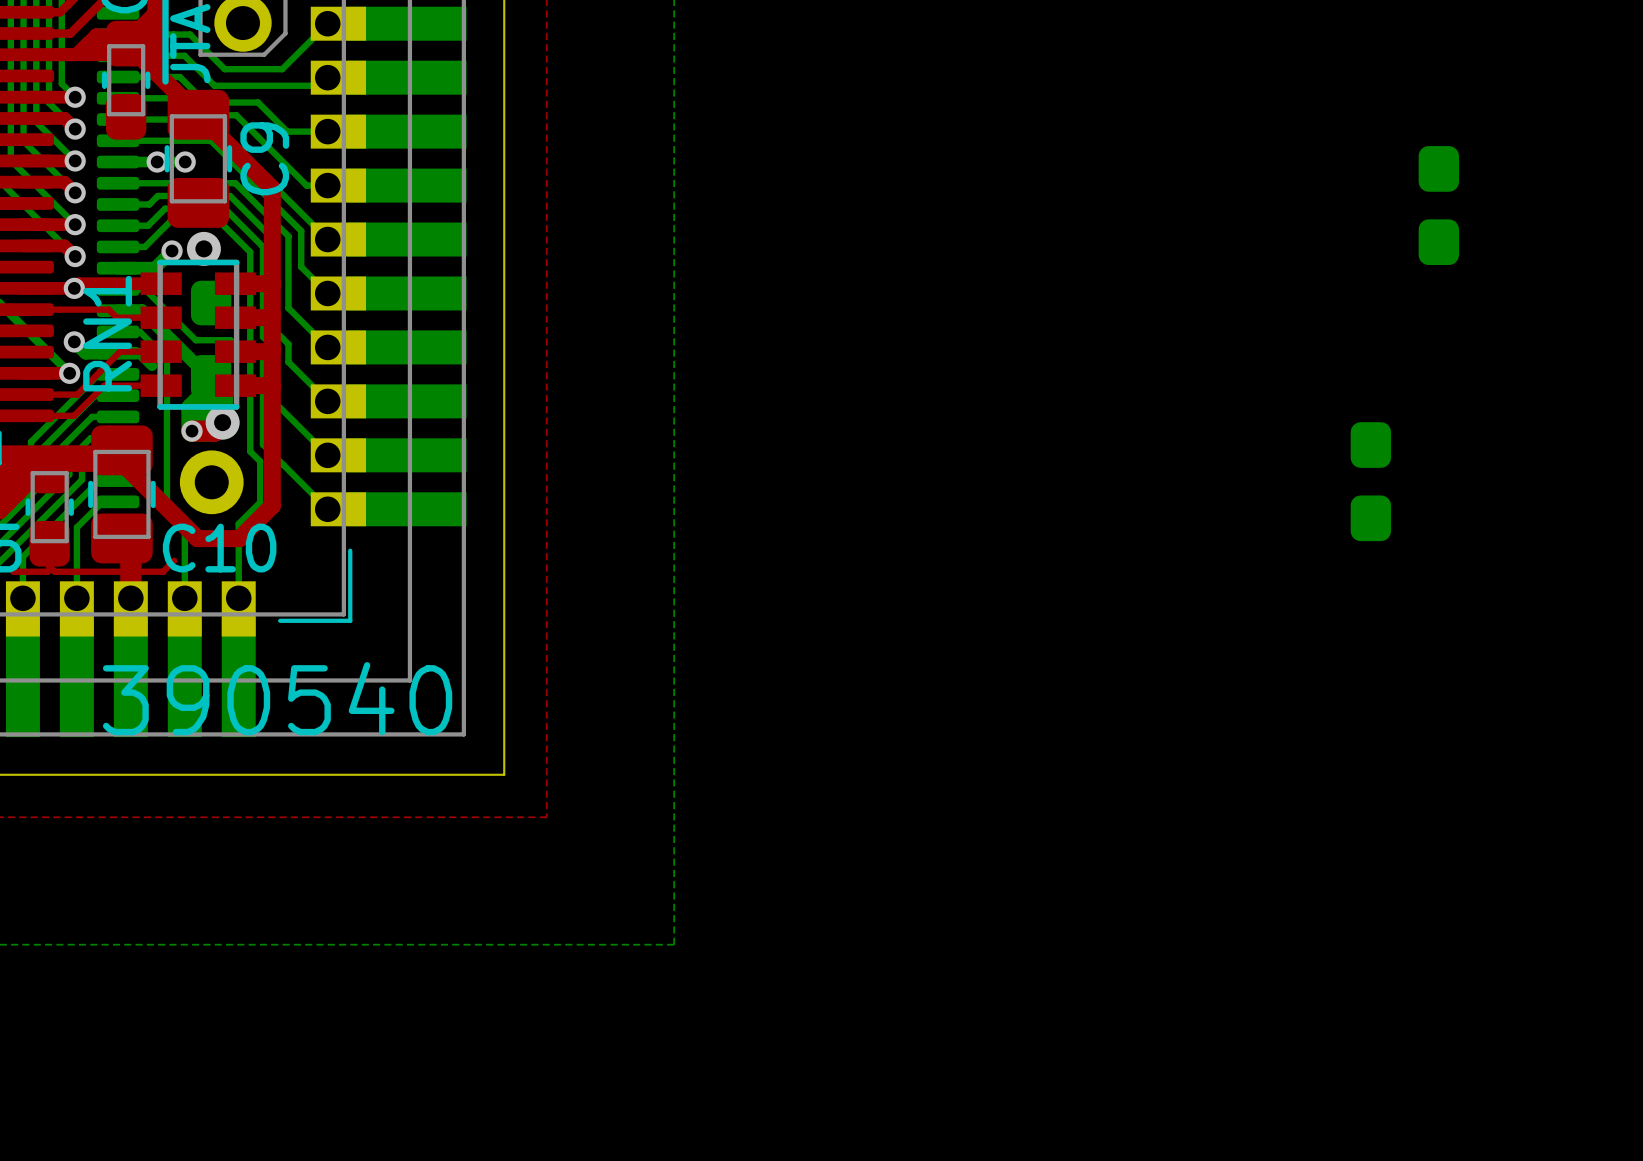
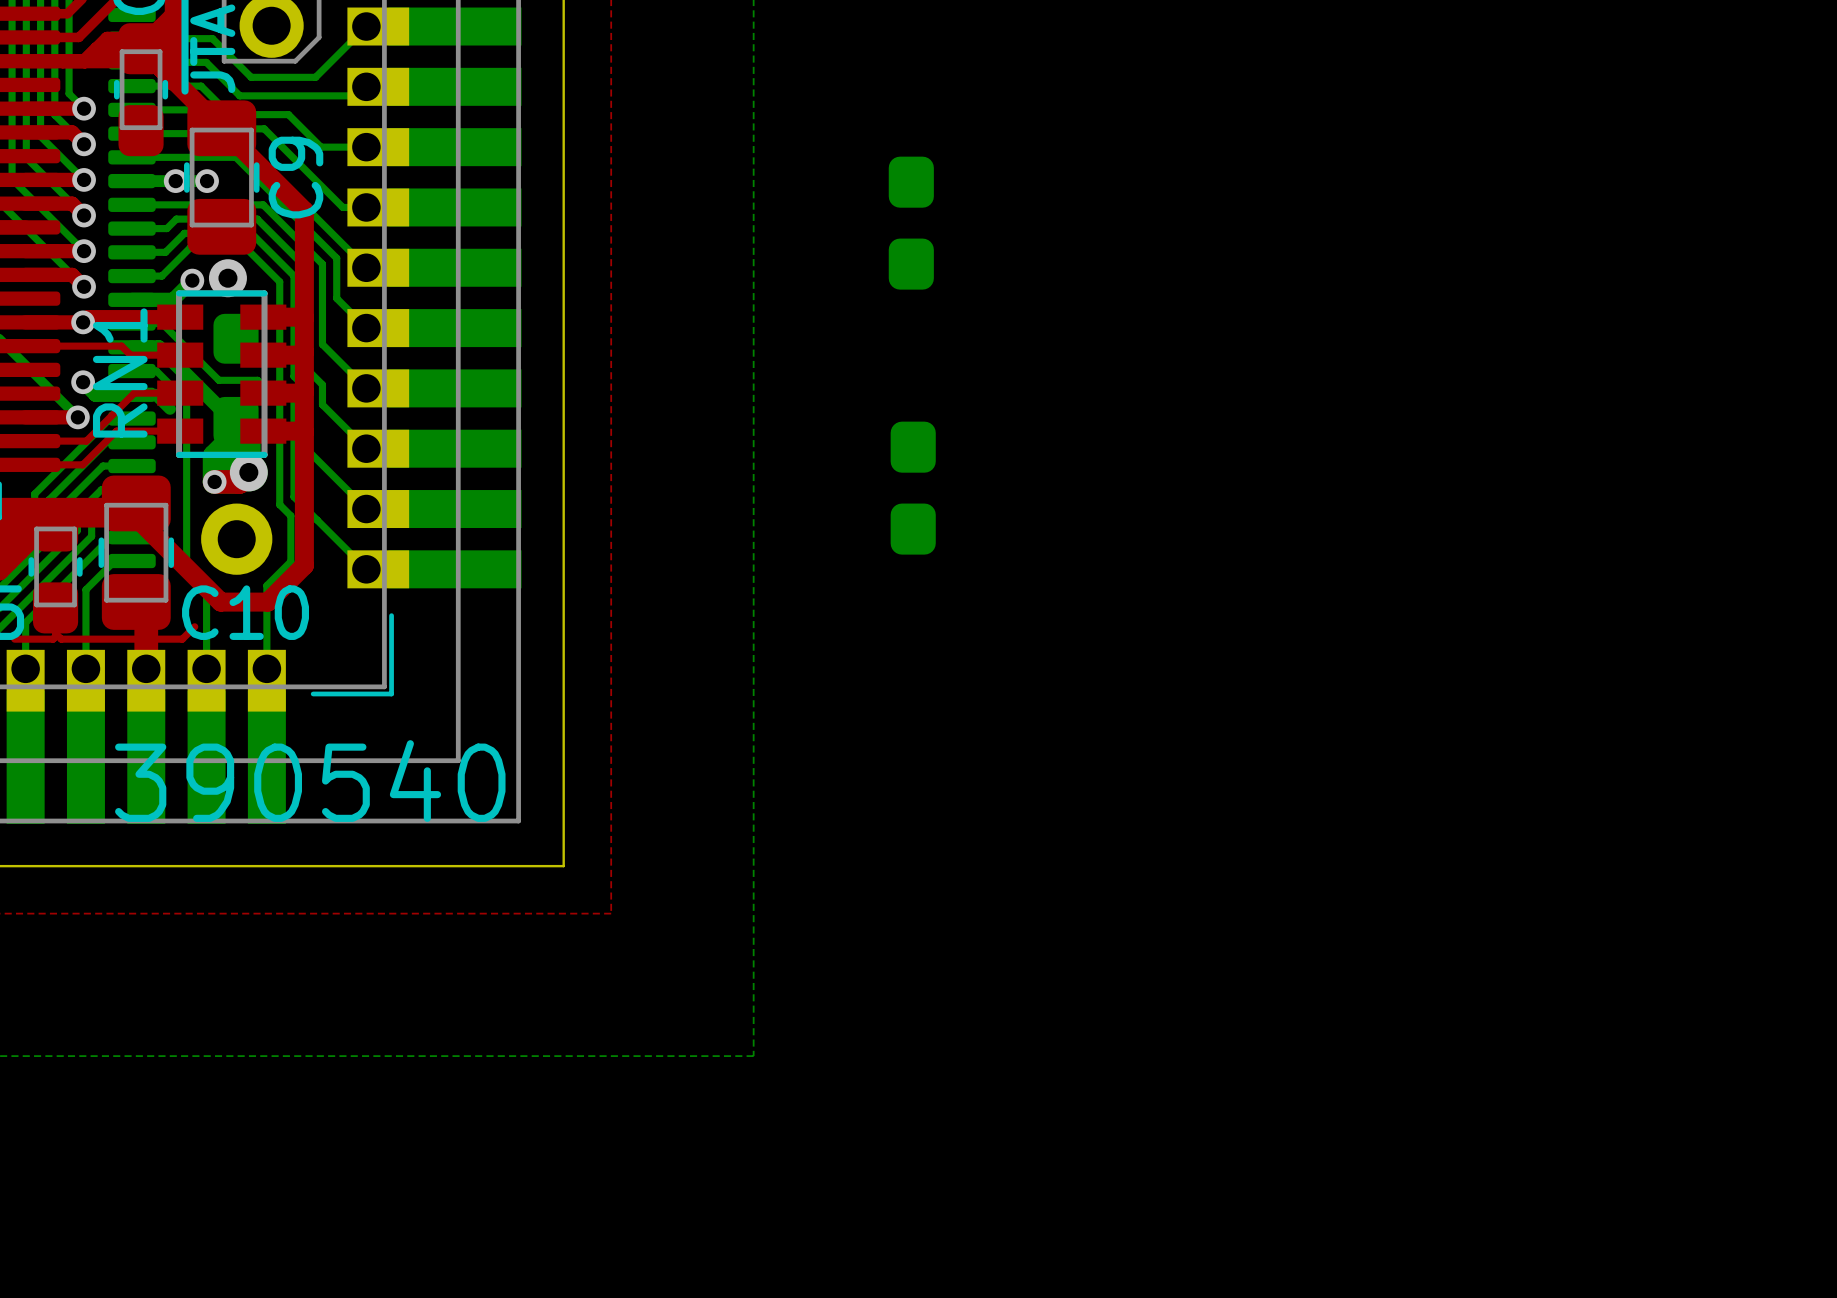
part: none -> (911, 223)
part: (1438, 205) -> none
part: none -> (913, 488)
part: (1370, 481) -> none

